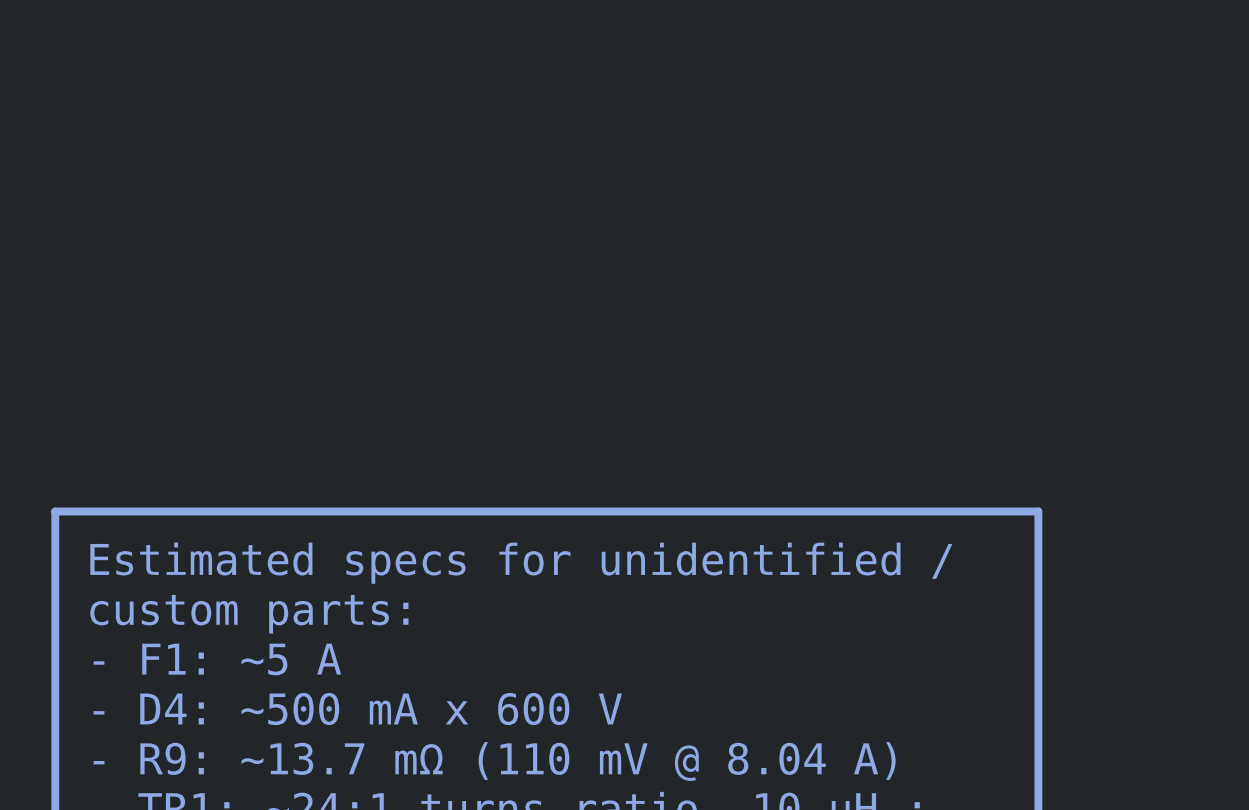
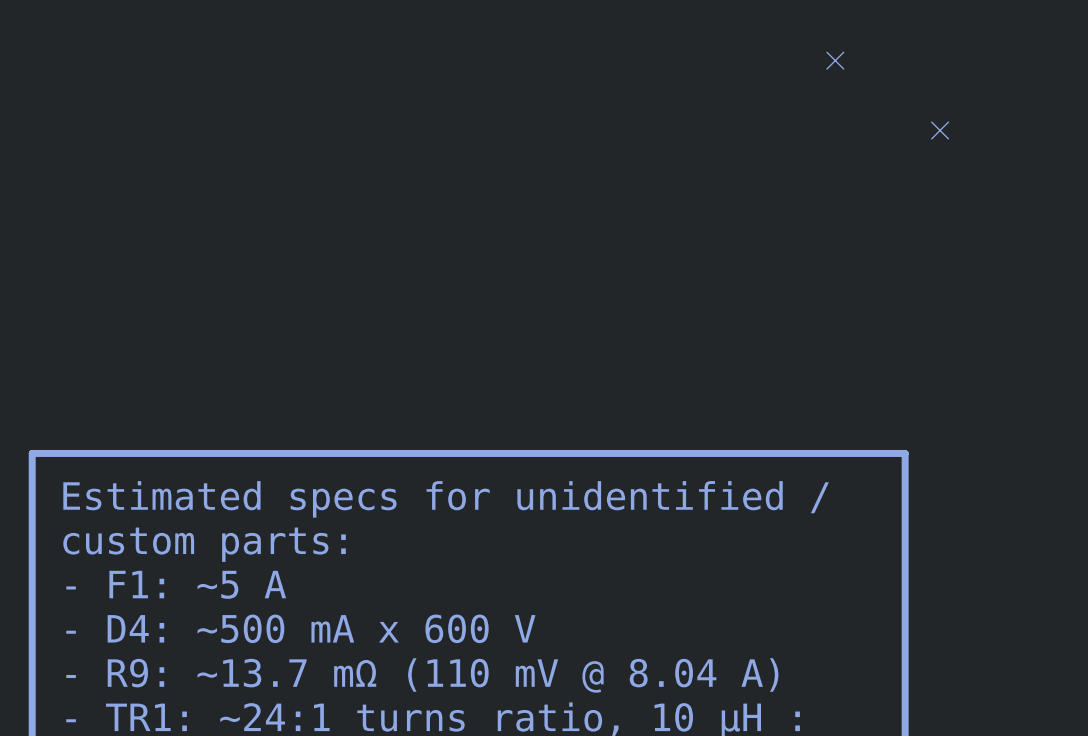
no-connect mark: none -> (835, 60)
no-connect mark: none -> (940, 130)

